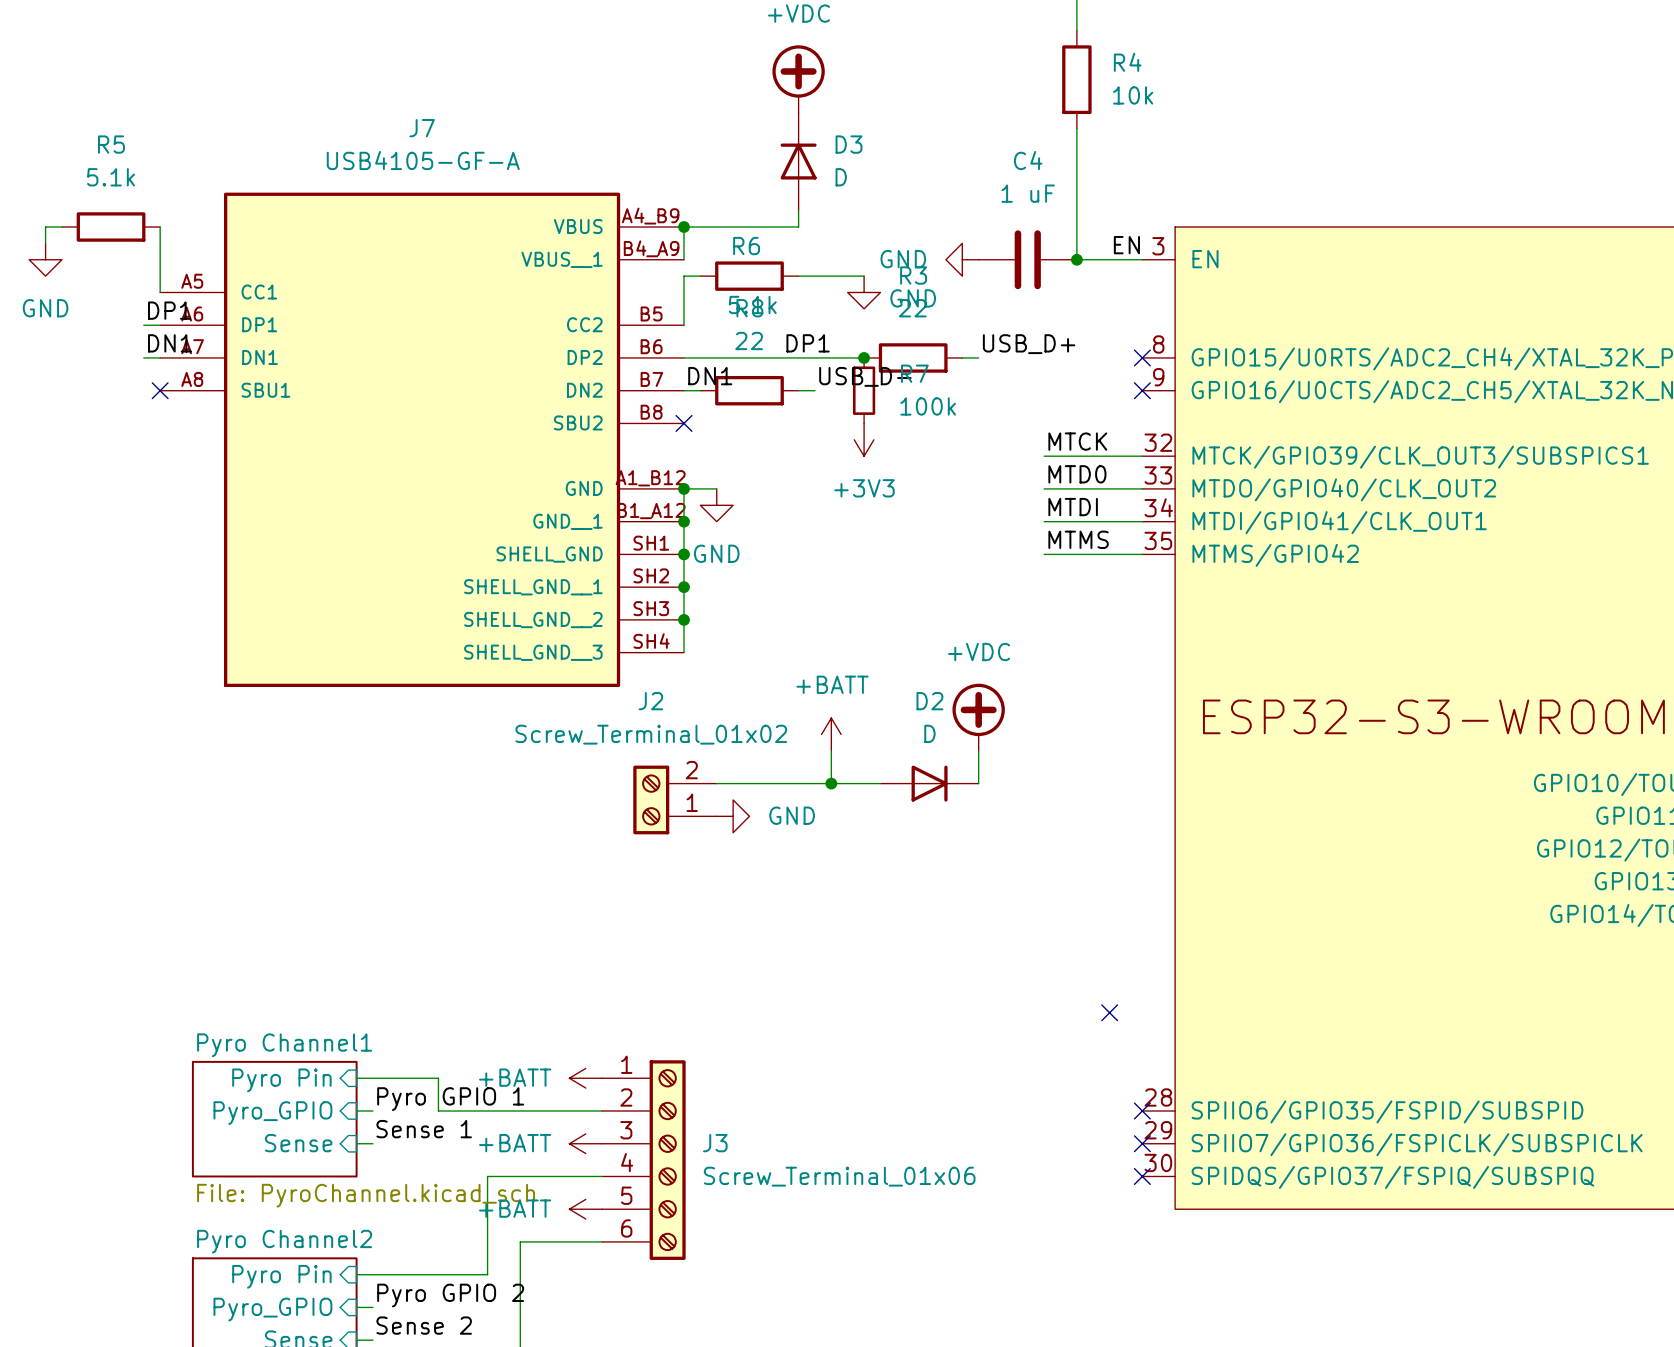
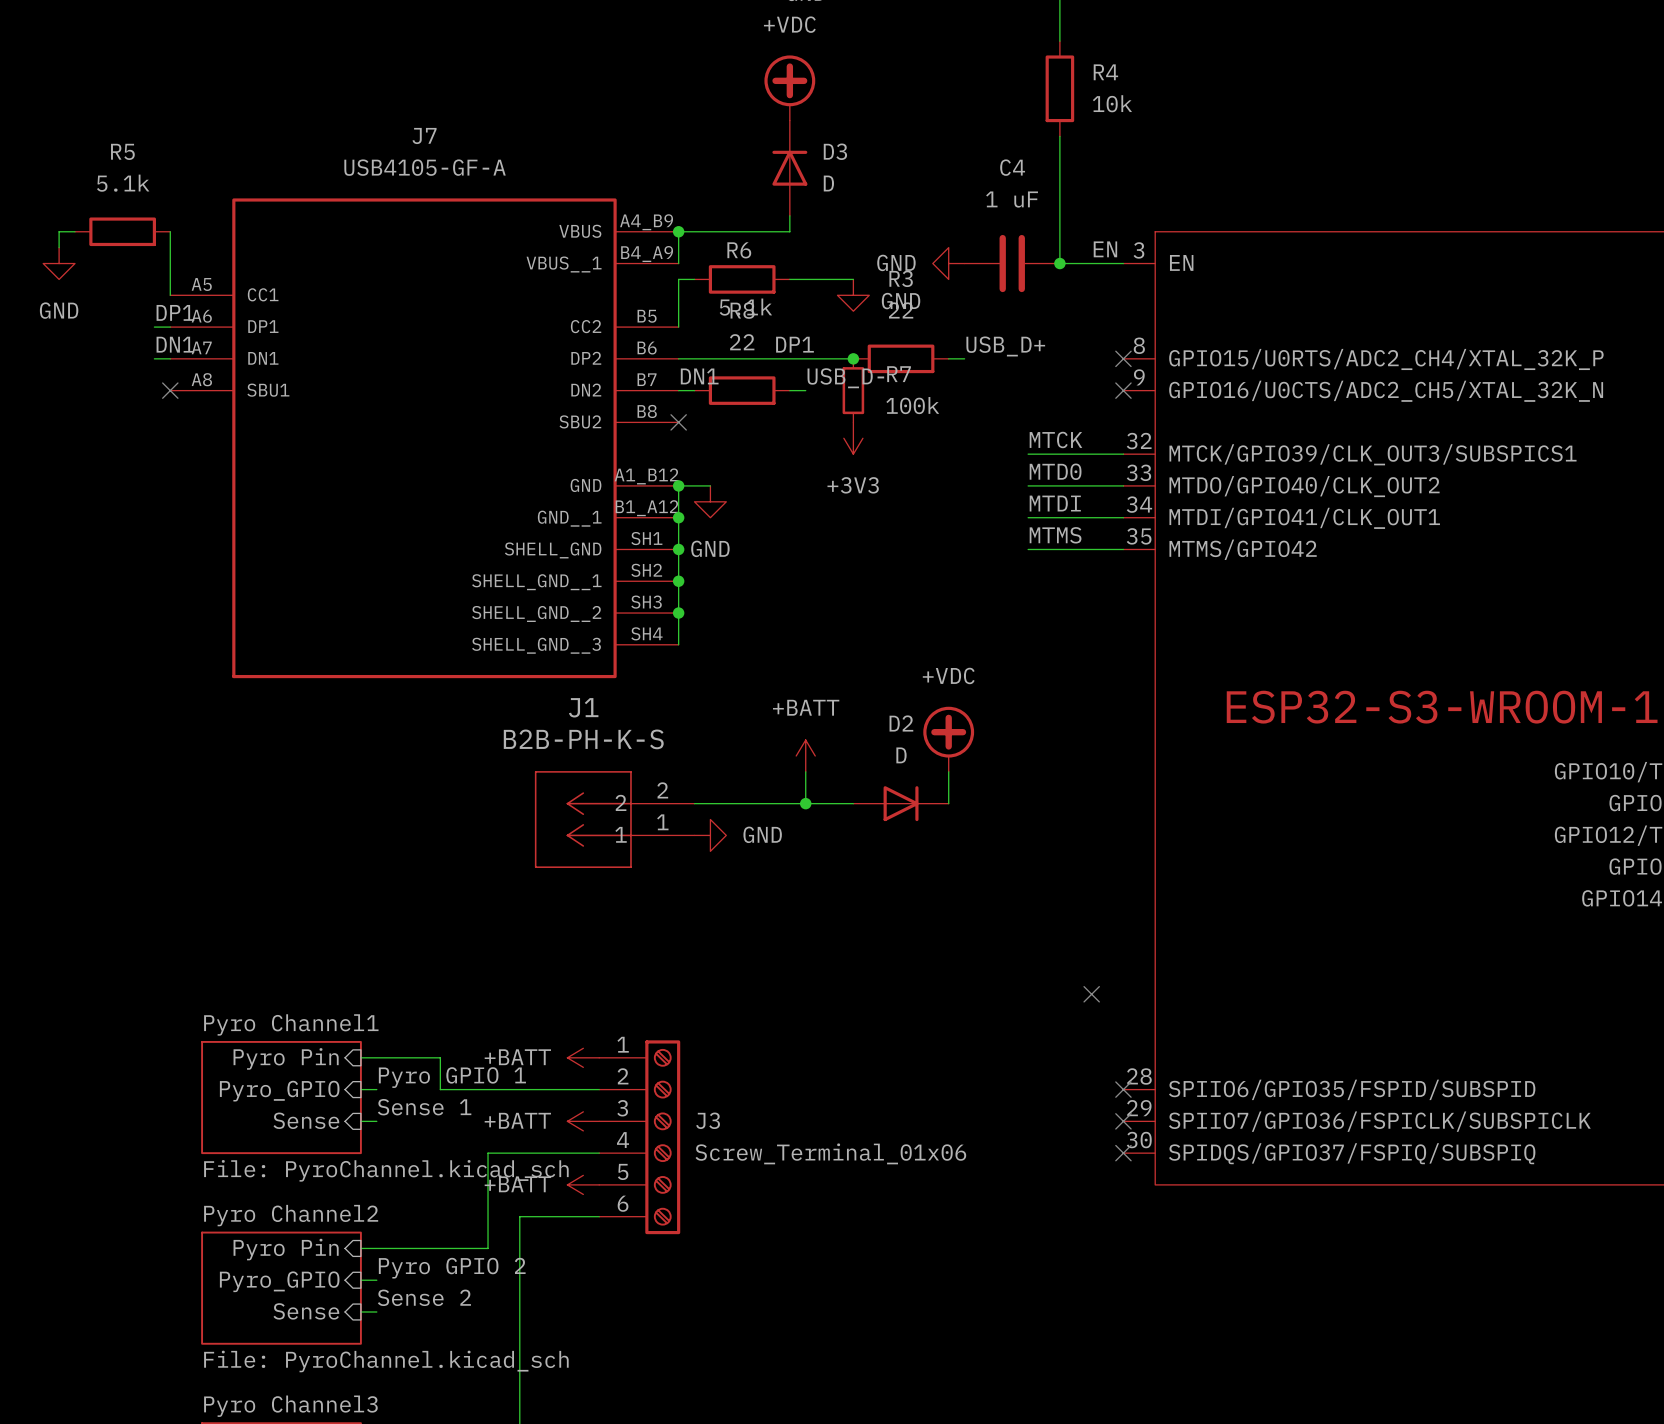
power symbol position: +VDC (978, 717) -> +VDC (948, 739)
power symbol position: +BATT (831, 734) -> +BATT (805, 755)
wire: (831, 750) (831, 783) -> (805, 771) (805, 803)
wire: (978, 750) (978, 783) -> (948, 771) (948, 803)
wire: (716, 783) (880, 783) -> (694, 803) (853, 803)
junction position: (831, 783) -> (805, 803)
D2 position: (929, 783) -> (901, 803)
J2: Screw_Terminal_01x02 (675, 799) -> none
power symbol position: GND (733, 816) -> GND (710, 835)
J1: none -> B2B-PH-K-S (614, 819)

